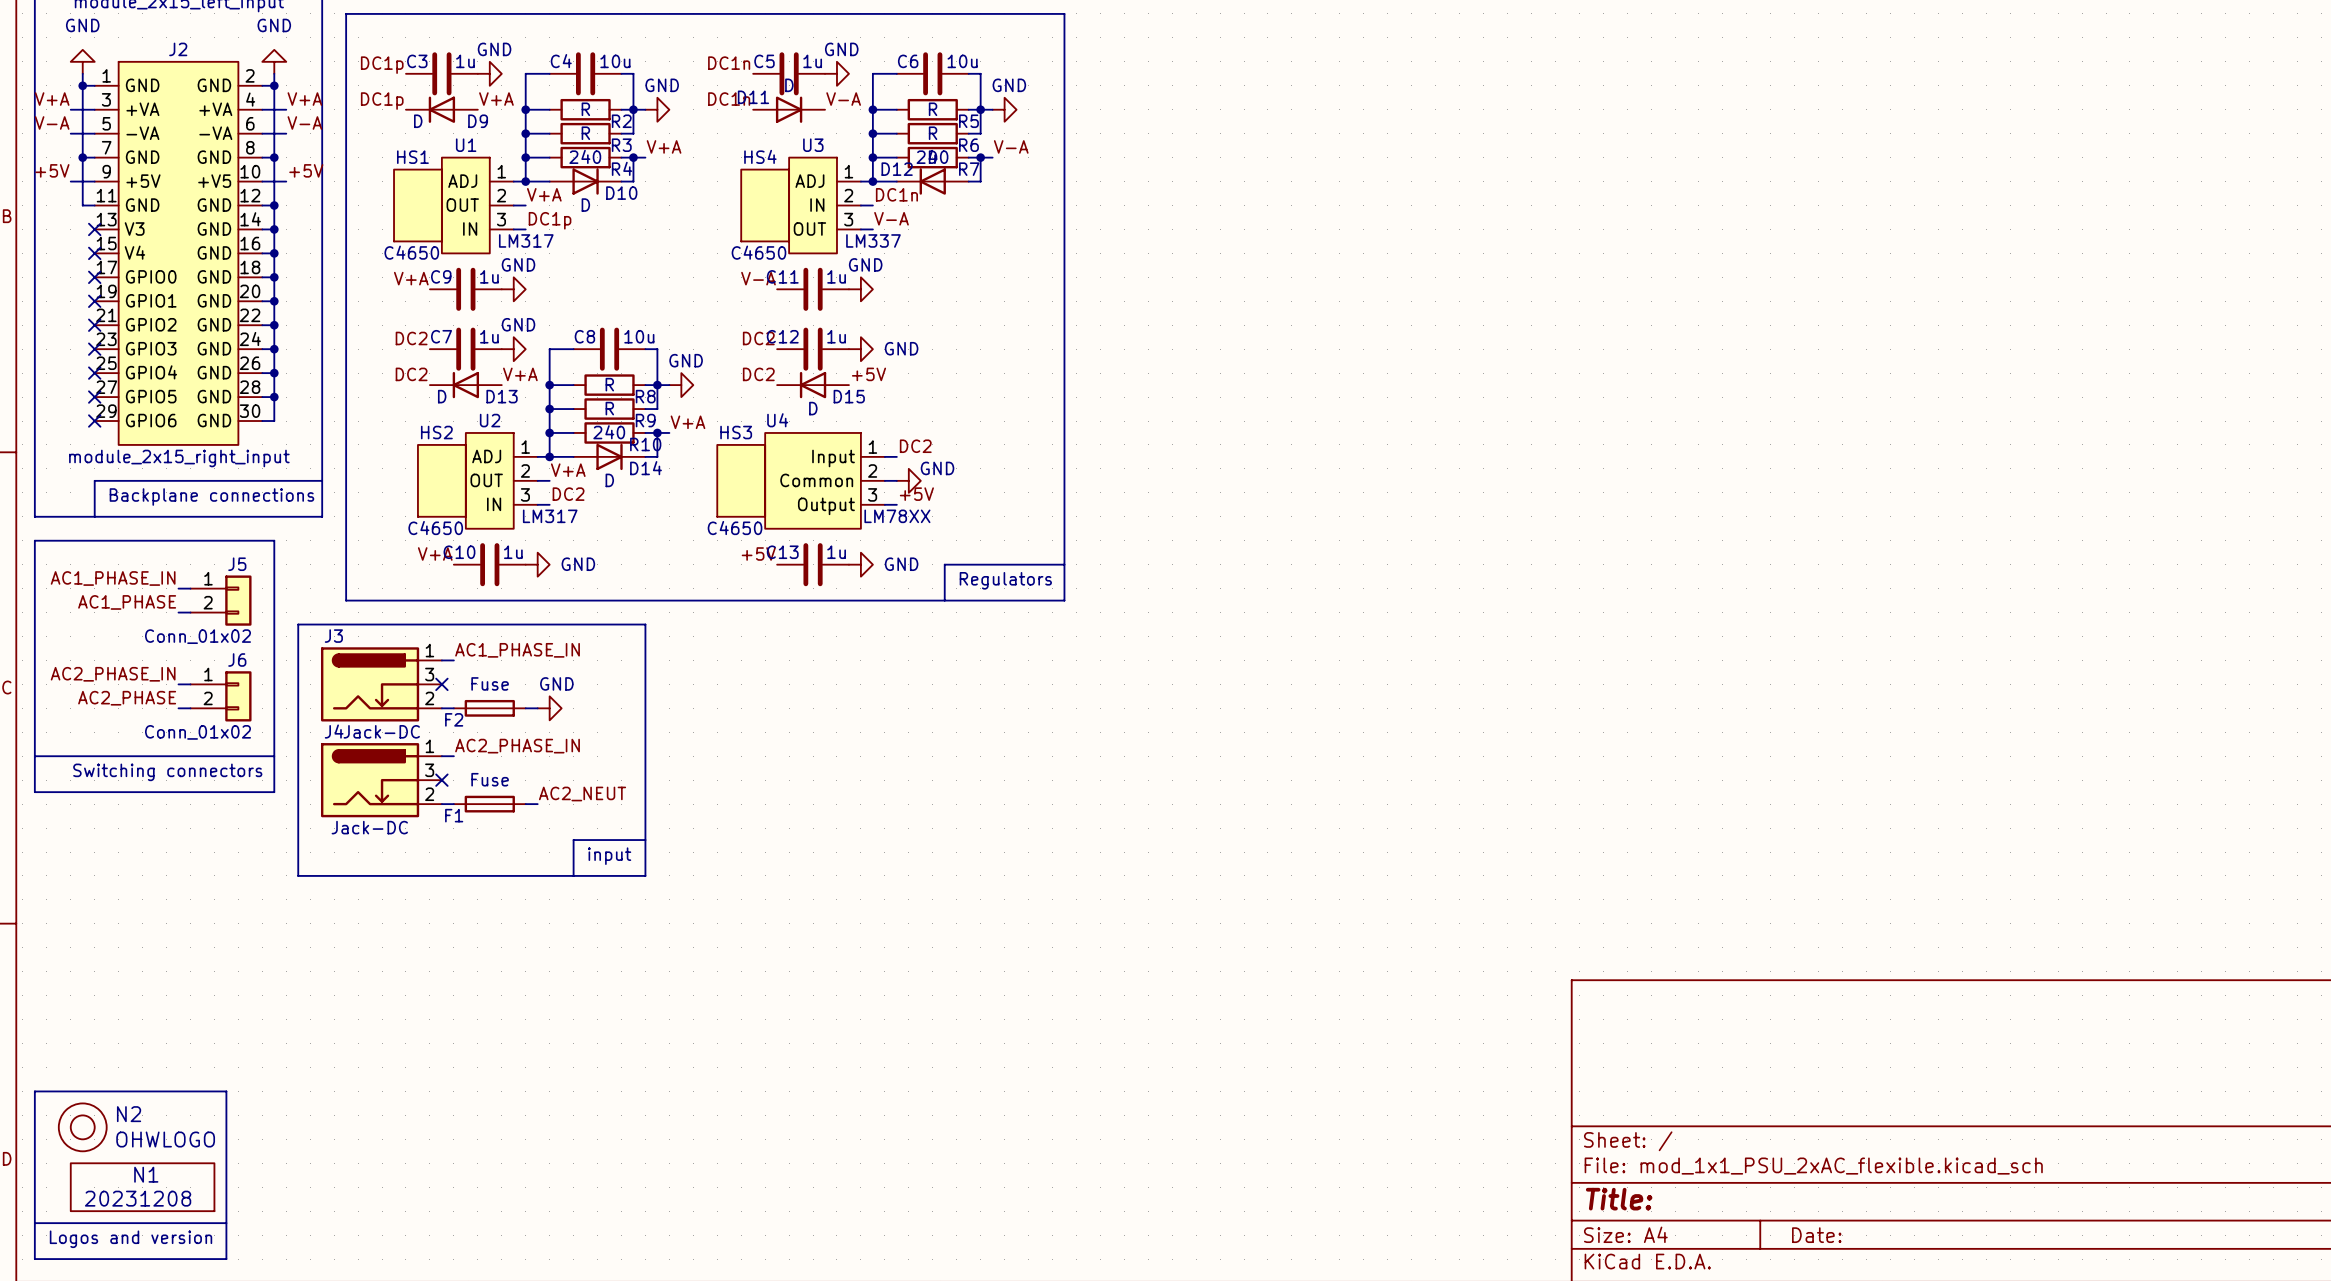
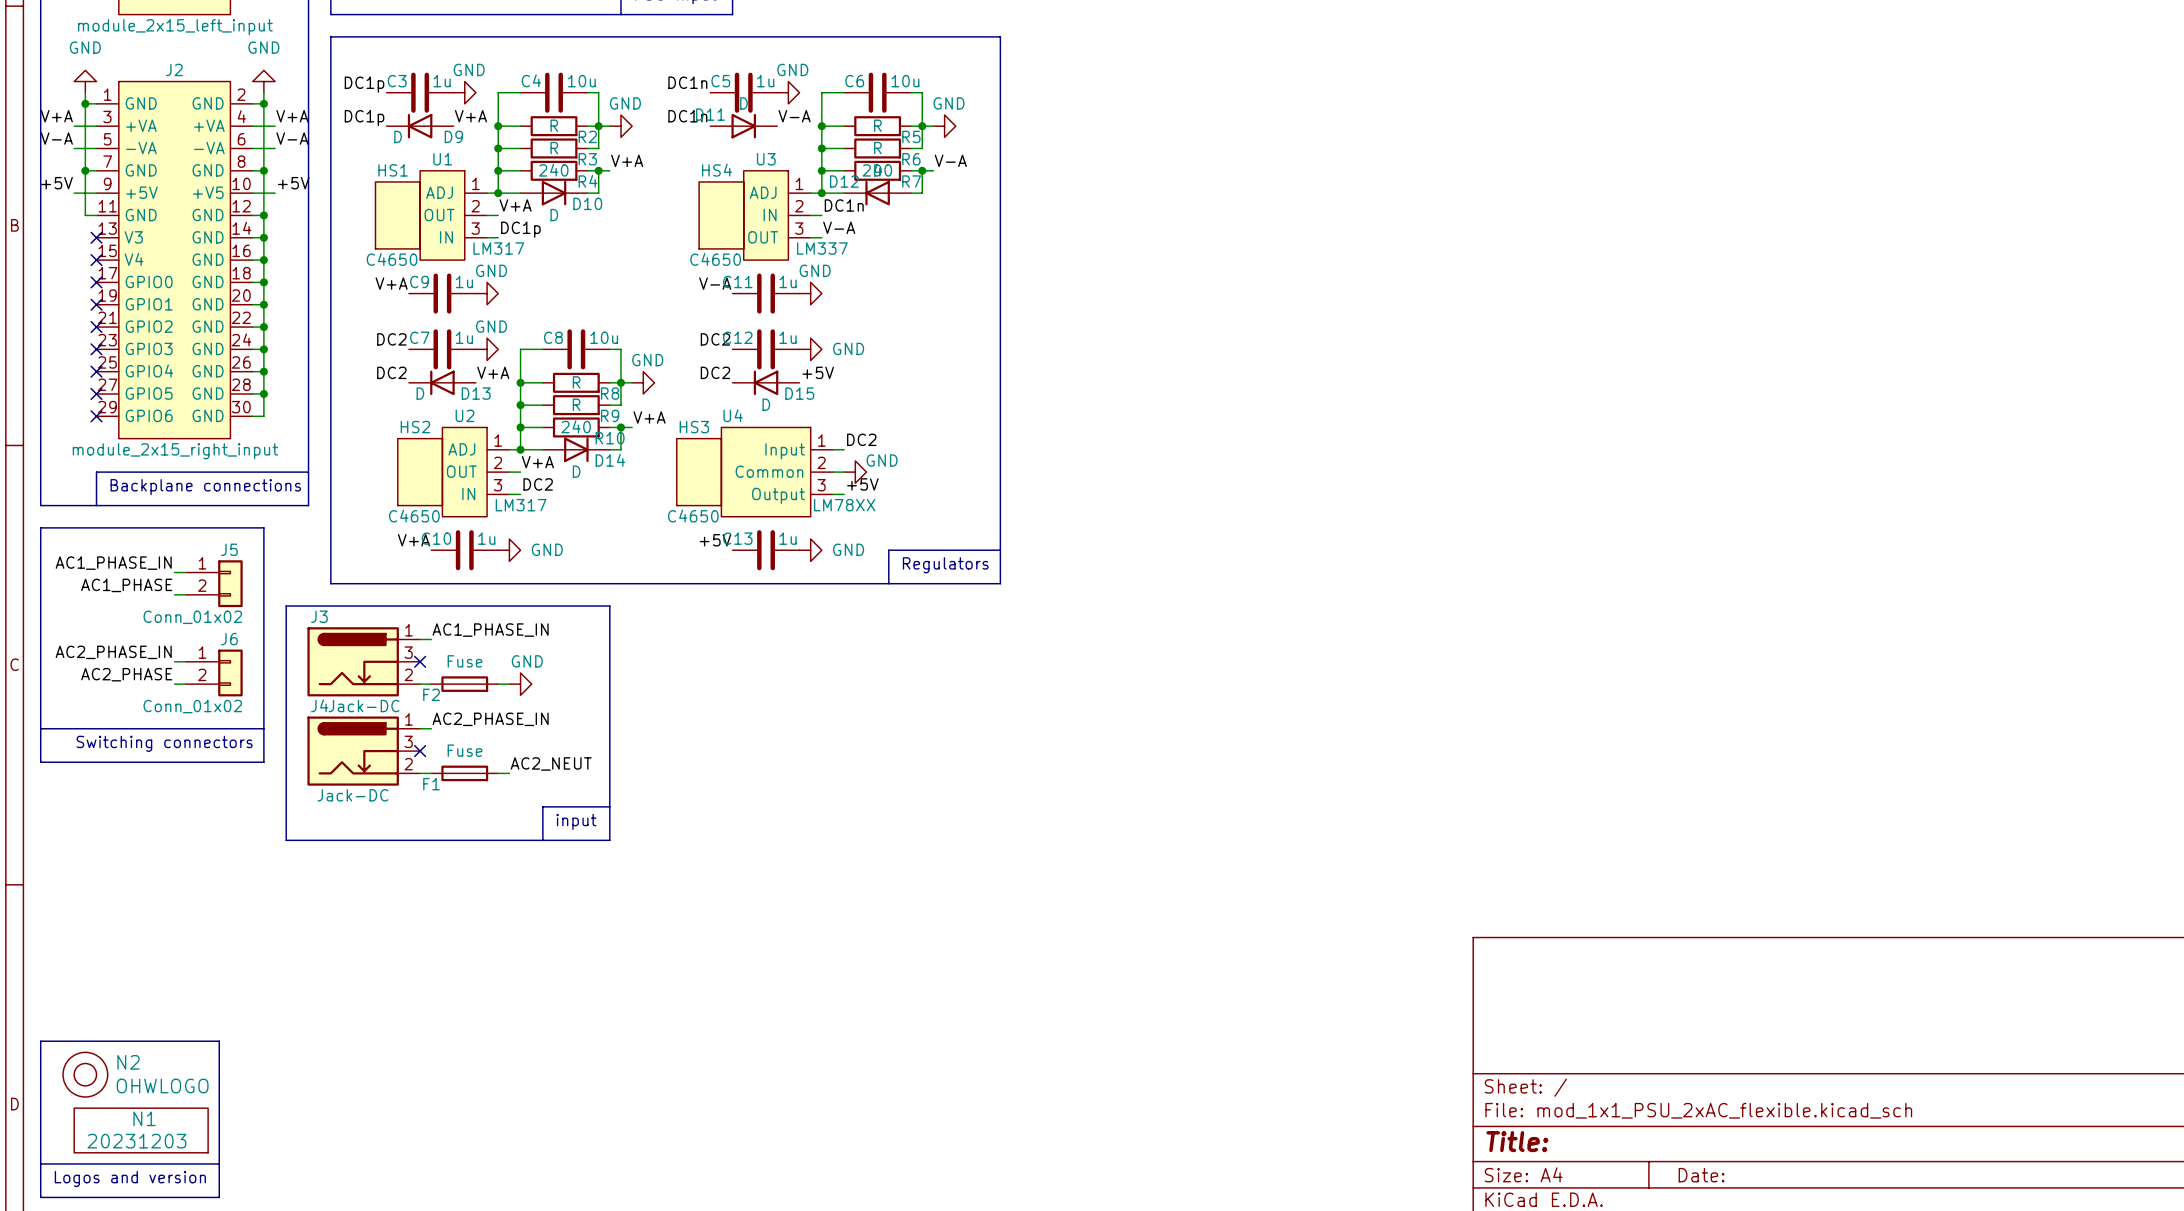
N1 value: 20231208 (138, 1198) -> 20231203 (136, 1141)

